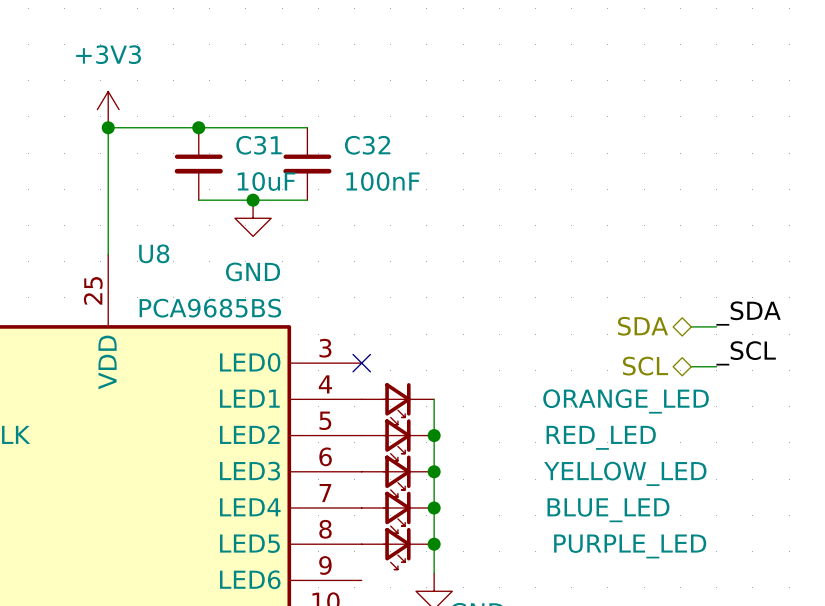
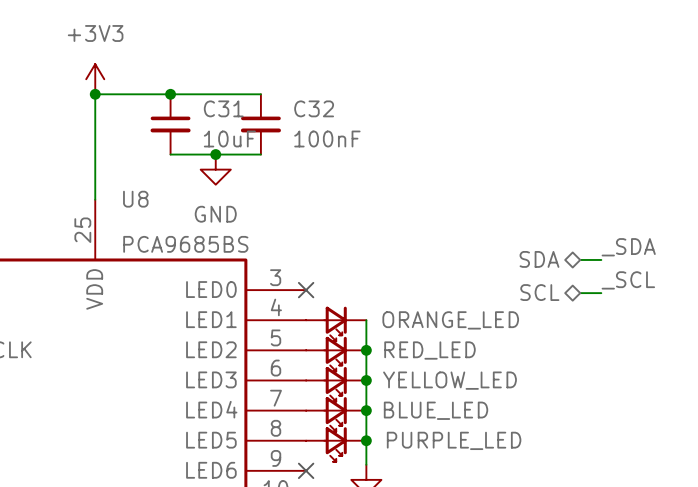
part value position: ORANGE_LED (626, 401) -> ORANGE_LED (450, 320)
part value position: RED_LED (601, 437) -> RED_LED (429, 350)
part value position: YELLOW_LED (625, 473) -> YELLOW_LED (449, 380)
part value position: BLUE_LED (608, 510) -> BLUE_LED (436, 410)
part value position: PURPLE_LED (630, 546) -> PURPLE_LED (454, 440)
no-connect mark: none -> (306, 470)

